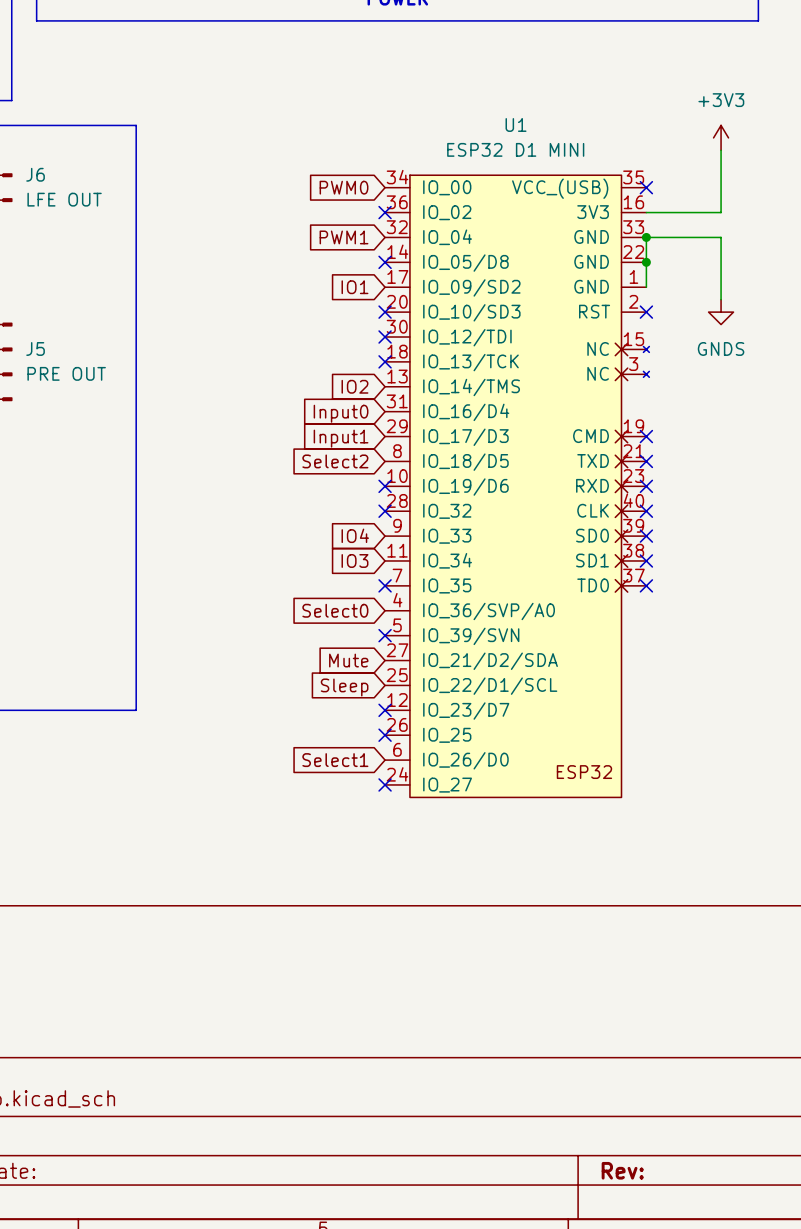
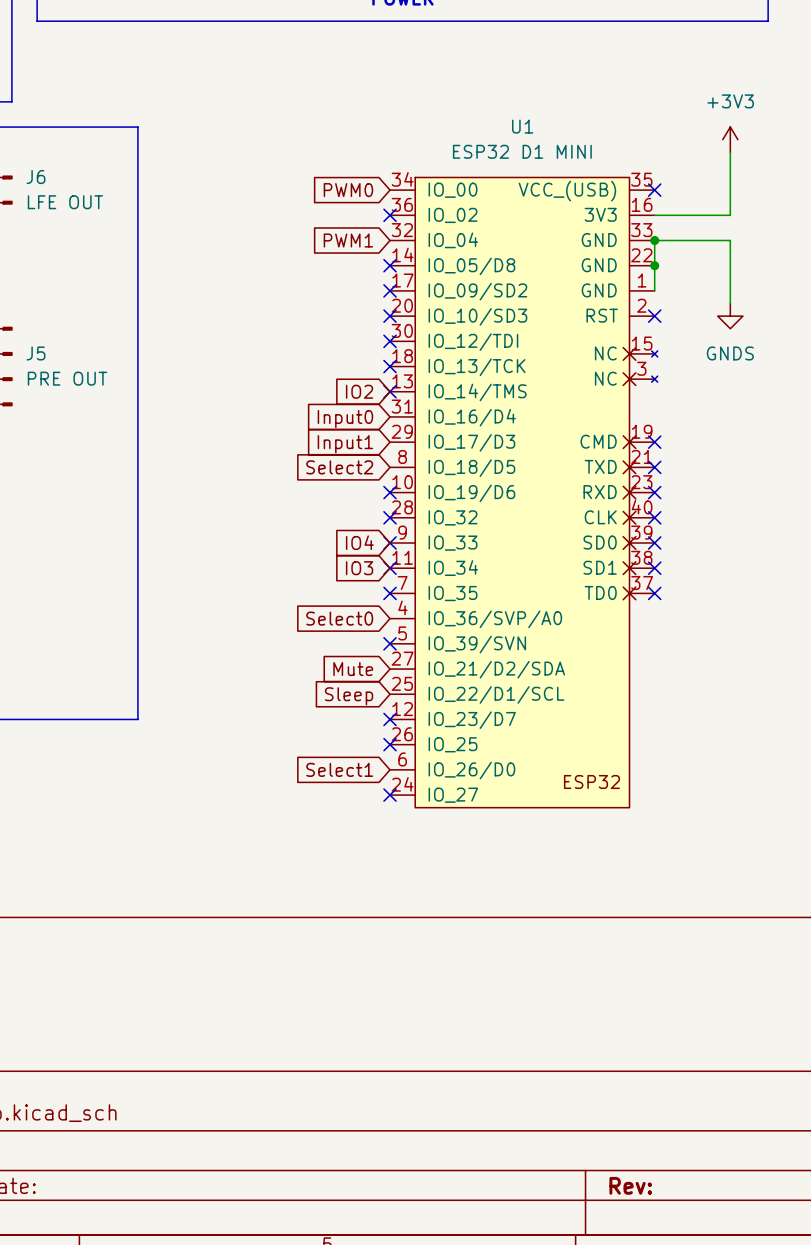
global label: IO1 (354, 287) -> none
no-connect mark: none -> (390, 290)
no-connect mark: none -> (390, 391)
no-connect mark: none -> (390, 542)
no-connect mark: none -> (390, 568)

